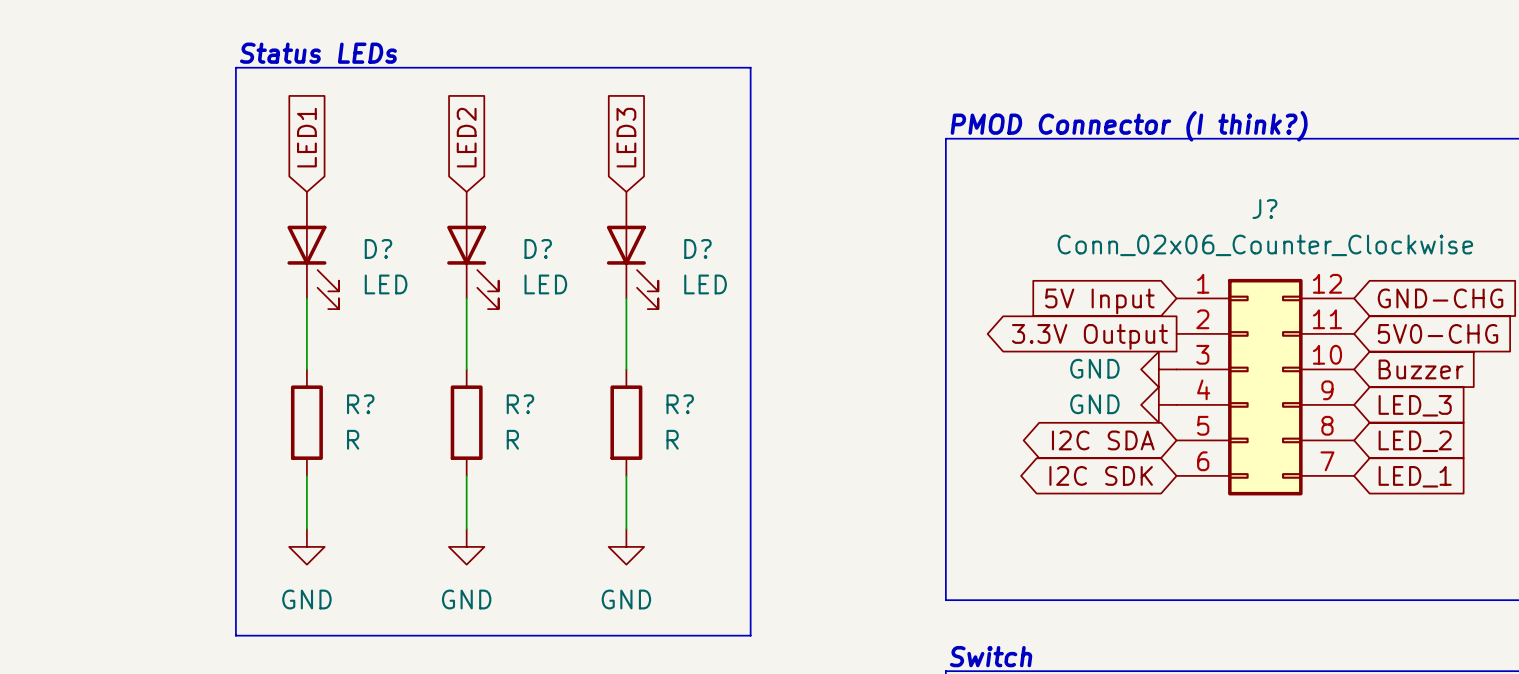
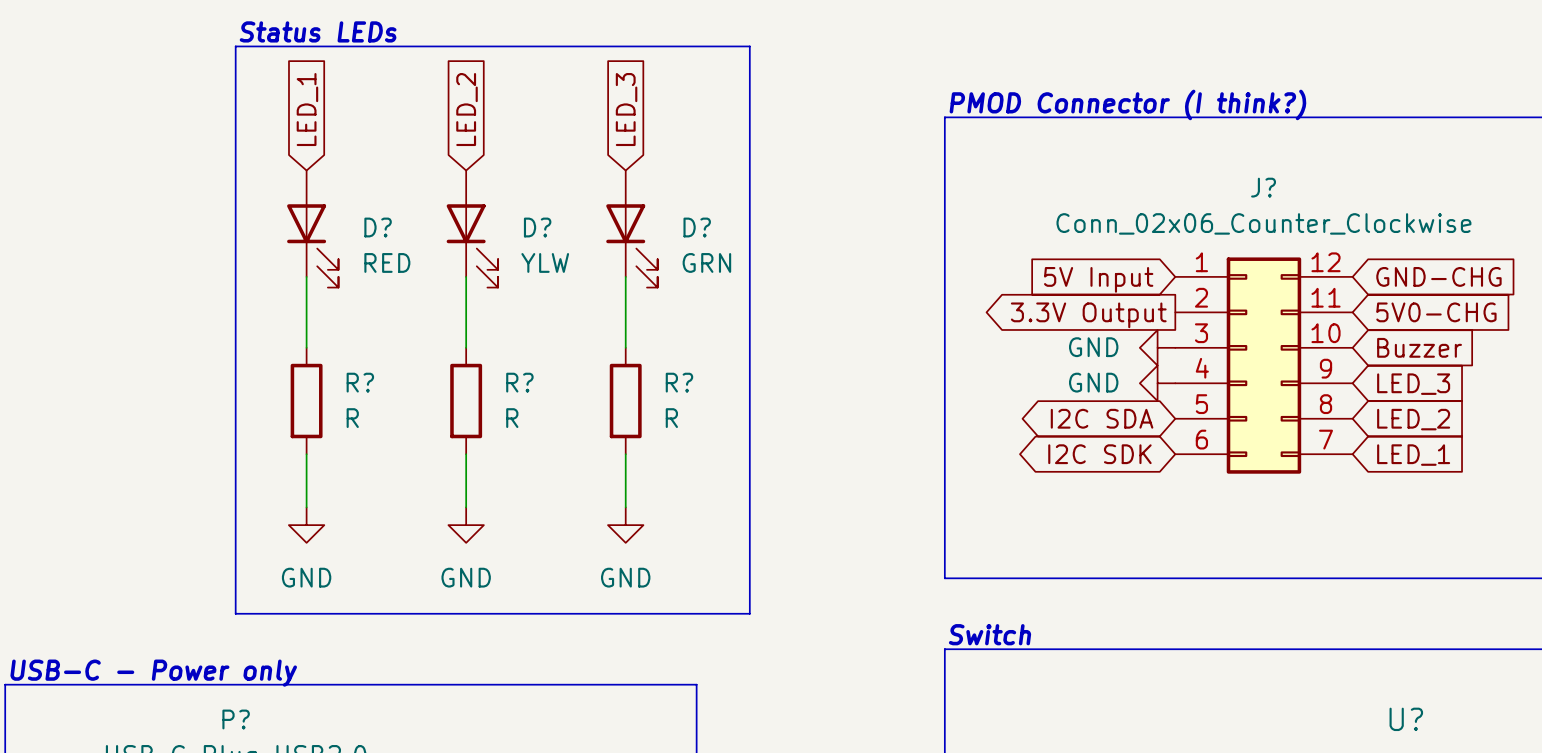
global label: LED1 (306, 137) -> LED_1 (307, 109)
global label: LED2 (466, 137) -> LED_2 (467, 109)
global label: LED3 (626, 137) -> LED_3 (626, 109)
D? value: LED (386, 284) -> RED (387, 262)
D? value: LED (545, 284) -> YLW (545, 262)
D? value: LED (705, 284) -> GRN (706, 262)

